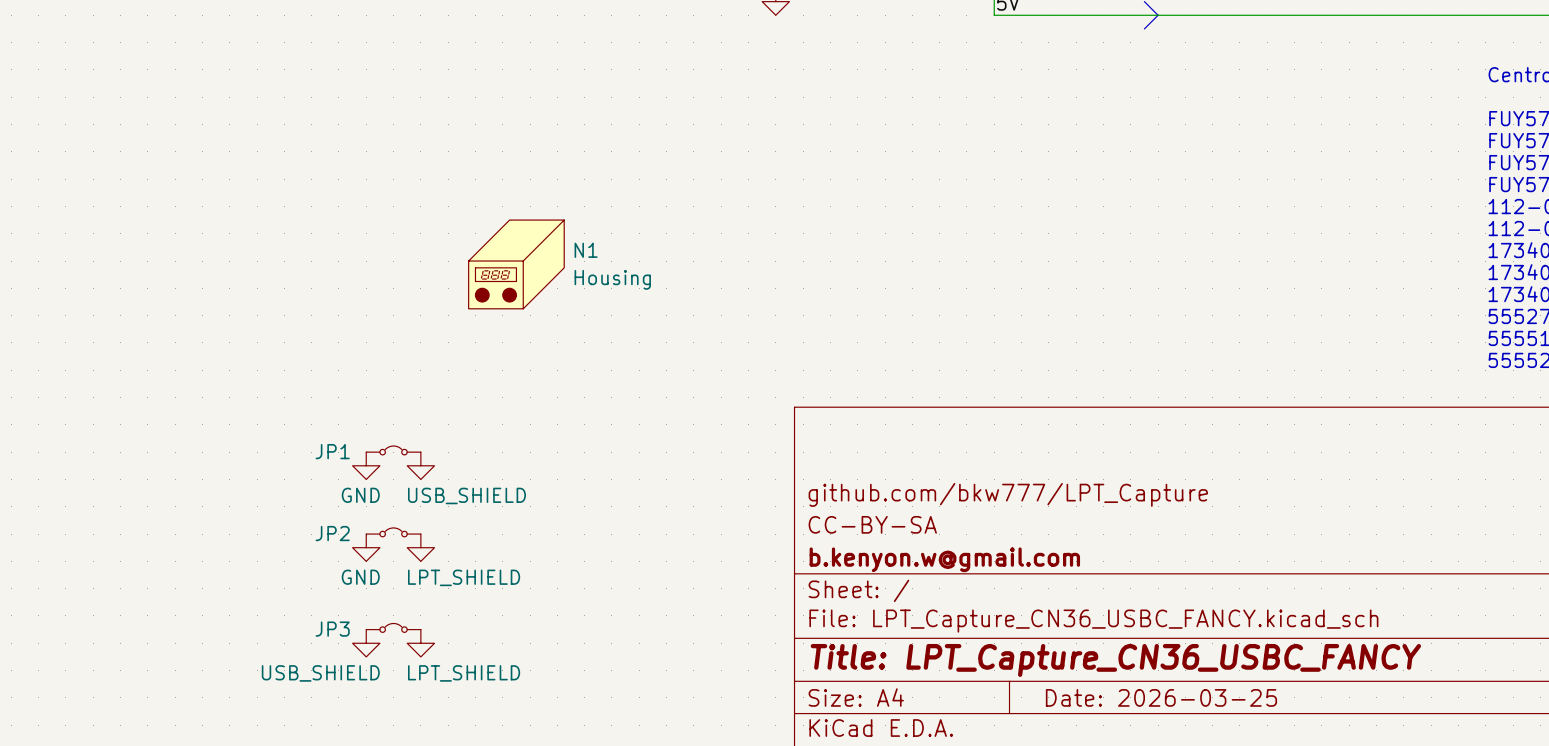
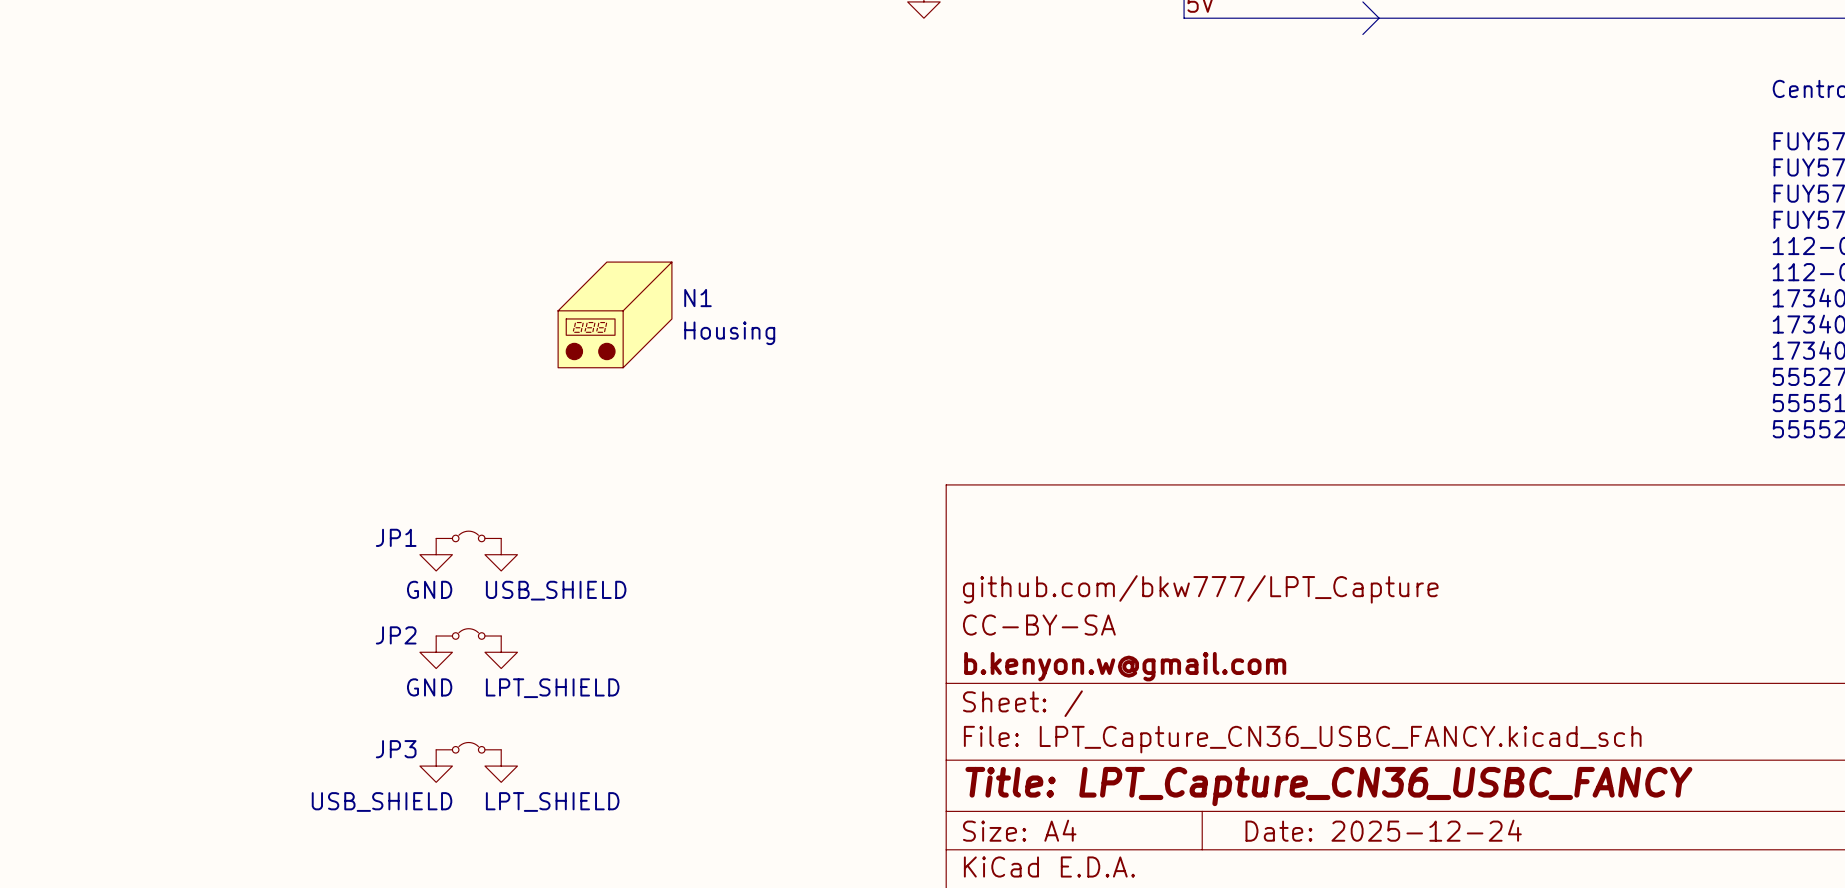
title block: Date: 2026-03-25 (1161, 697) -> Date: 2025-12-24 (1383, 830)

